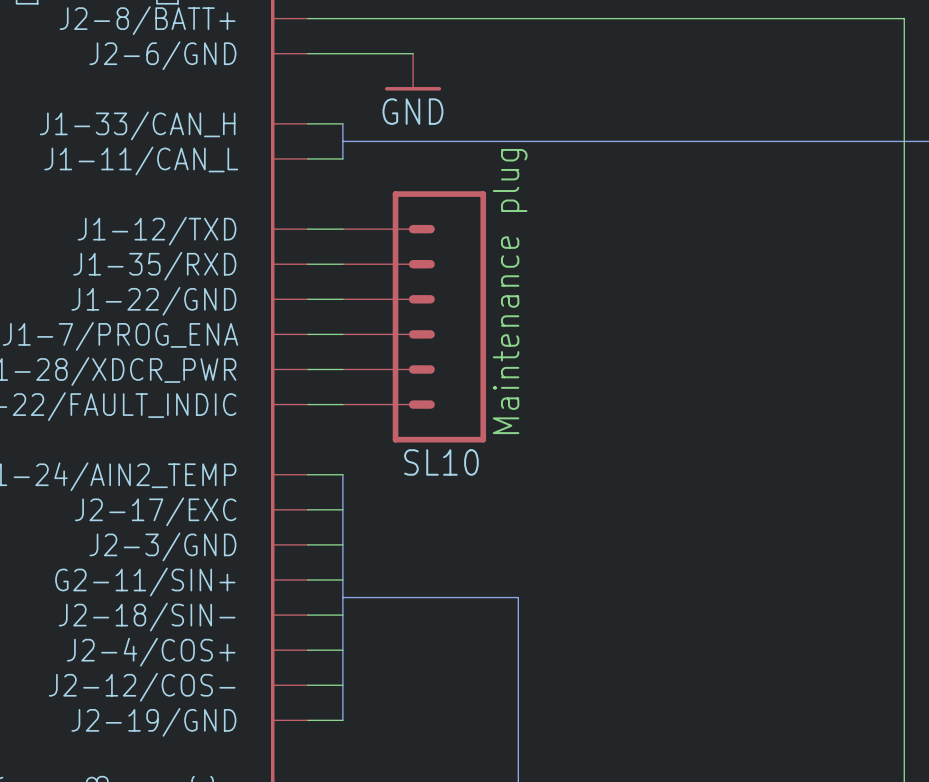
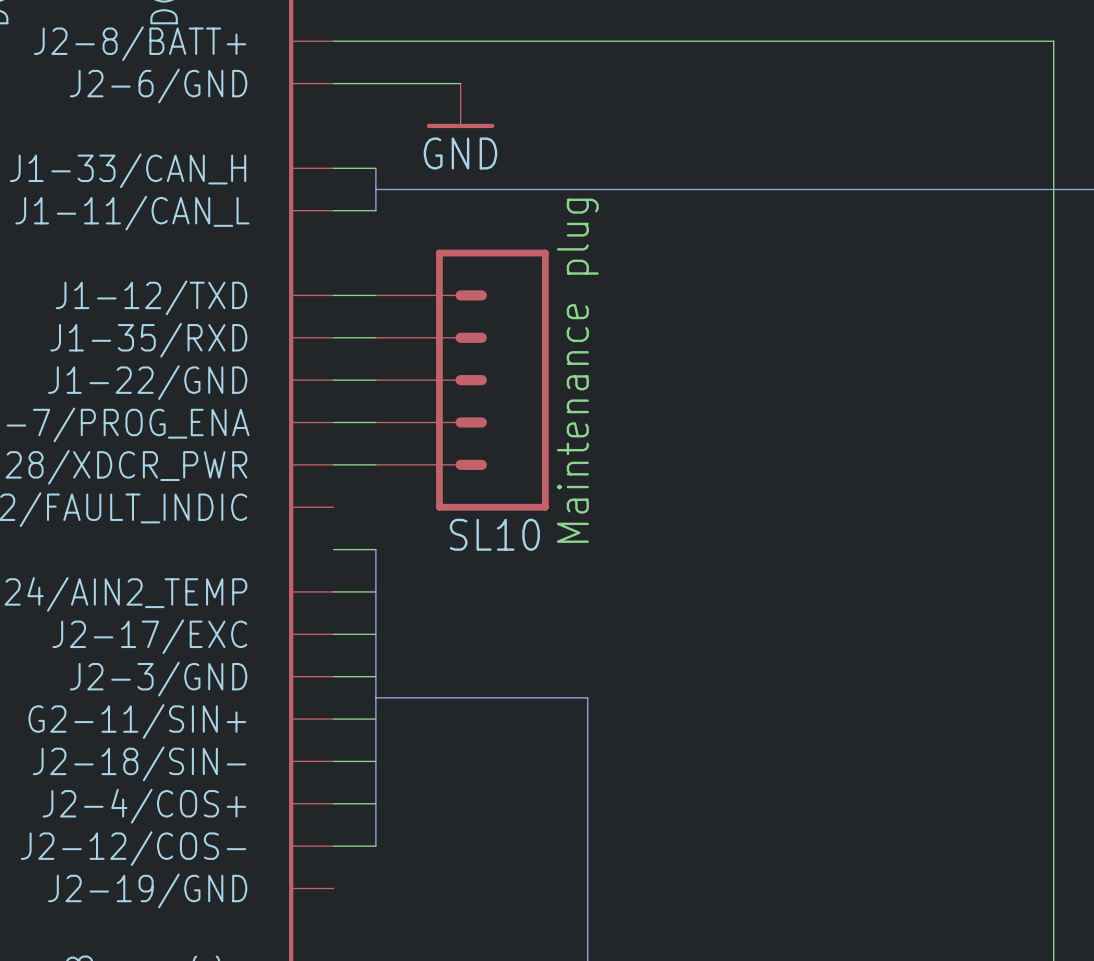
SL10 symbol: [342, 191, 487, 443] -> [375, 249, 549, 511]
wire: (307, 404) (342, 404) -> (333, 549) (375, 549)
bus: (342, 597) (518, 597) -> (375, 697) (587, 697) (587, 740)
bus: (342, 685) (342, 720) -> (375, 549) (375, 591)
wire: (307, 720) (342, 720) -> none

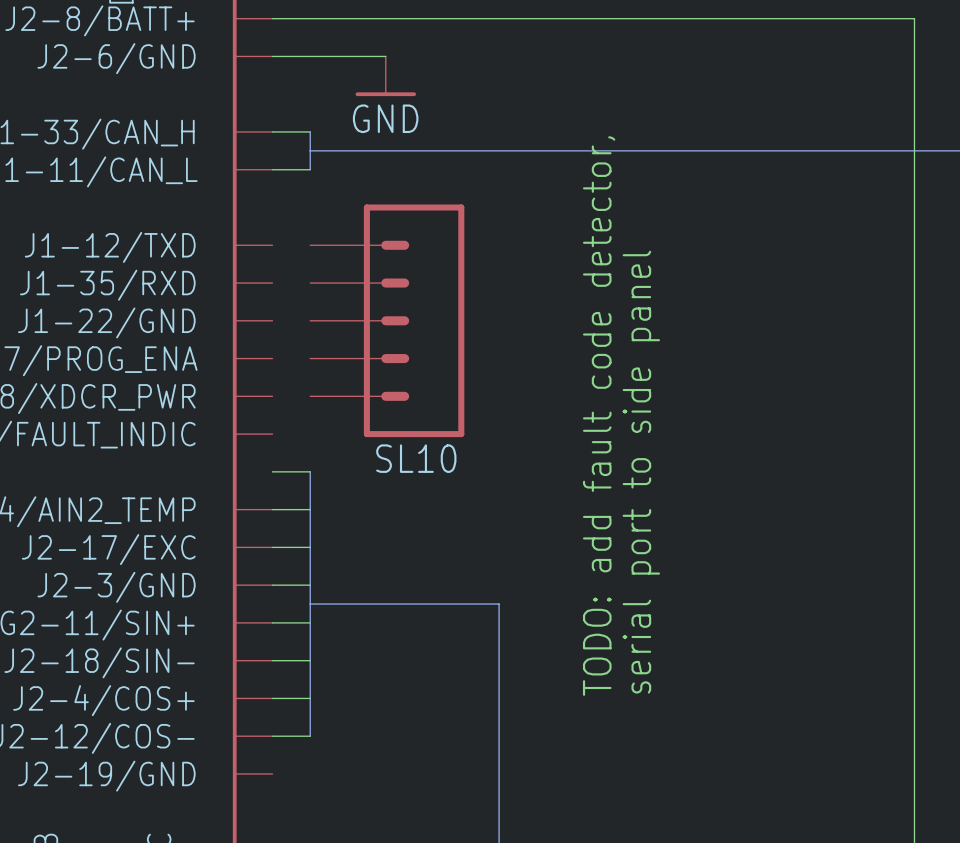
wire: (333, 295) (375, 295) -> none
wire: (333, 337) (375, 337) -> none
text: Maintenance plug (577, 370) -> none
wire: (333, 380) (375, 380) -> none
wire: (333, 422) (375, 422) -> none
wire: (333, 464) (375, 464) -> none
text: none -> TODO: add fault code detector, (599, 416)
text: none -> serial port to side panel (641, 472)

